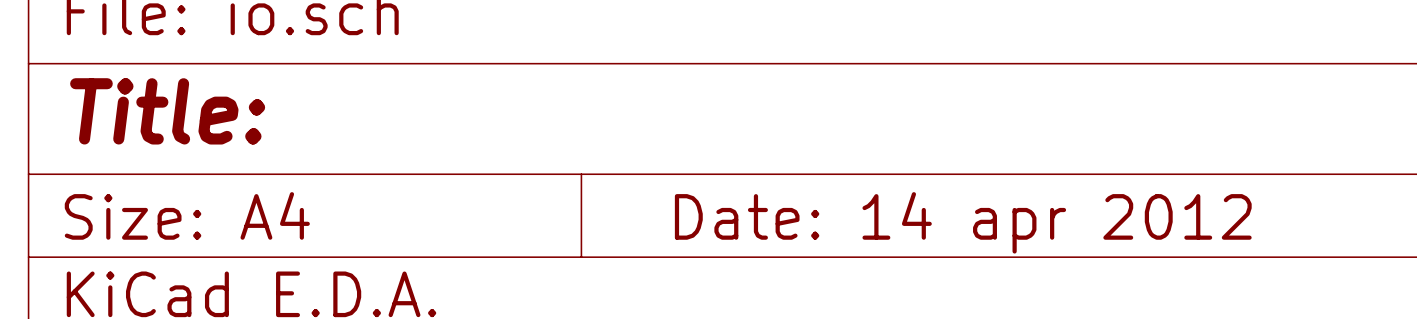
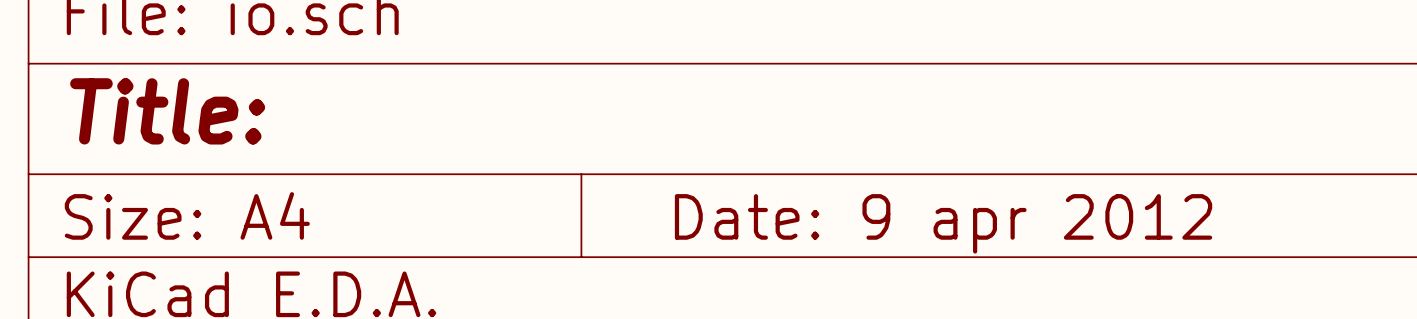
title block: Date: 14 apr 2012 (963, 222) -> Date: 9 apr 2012 (943, 223)

